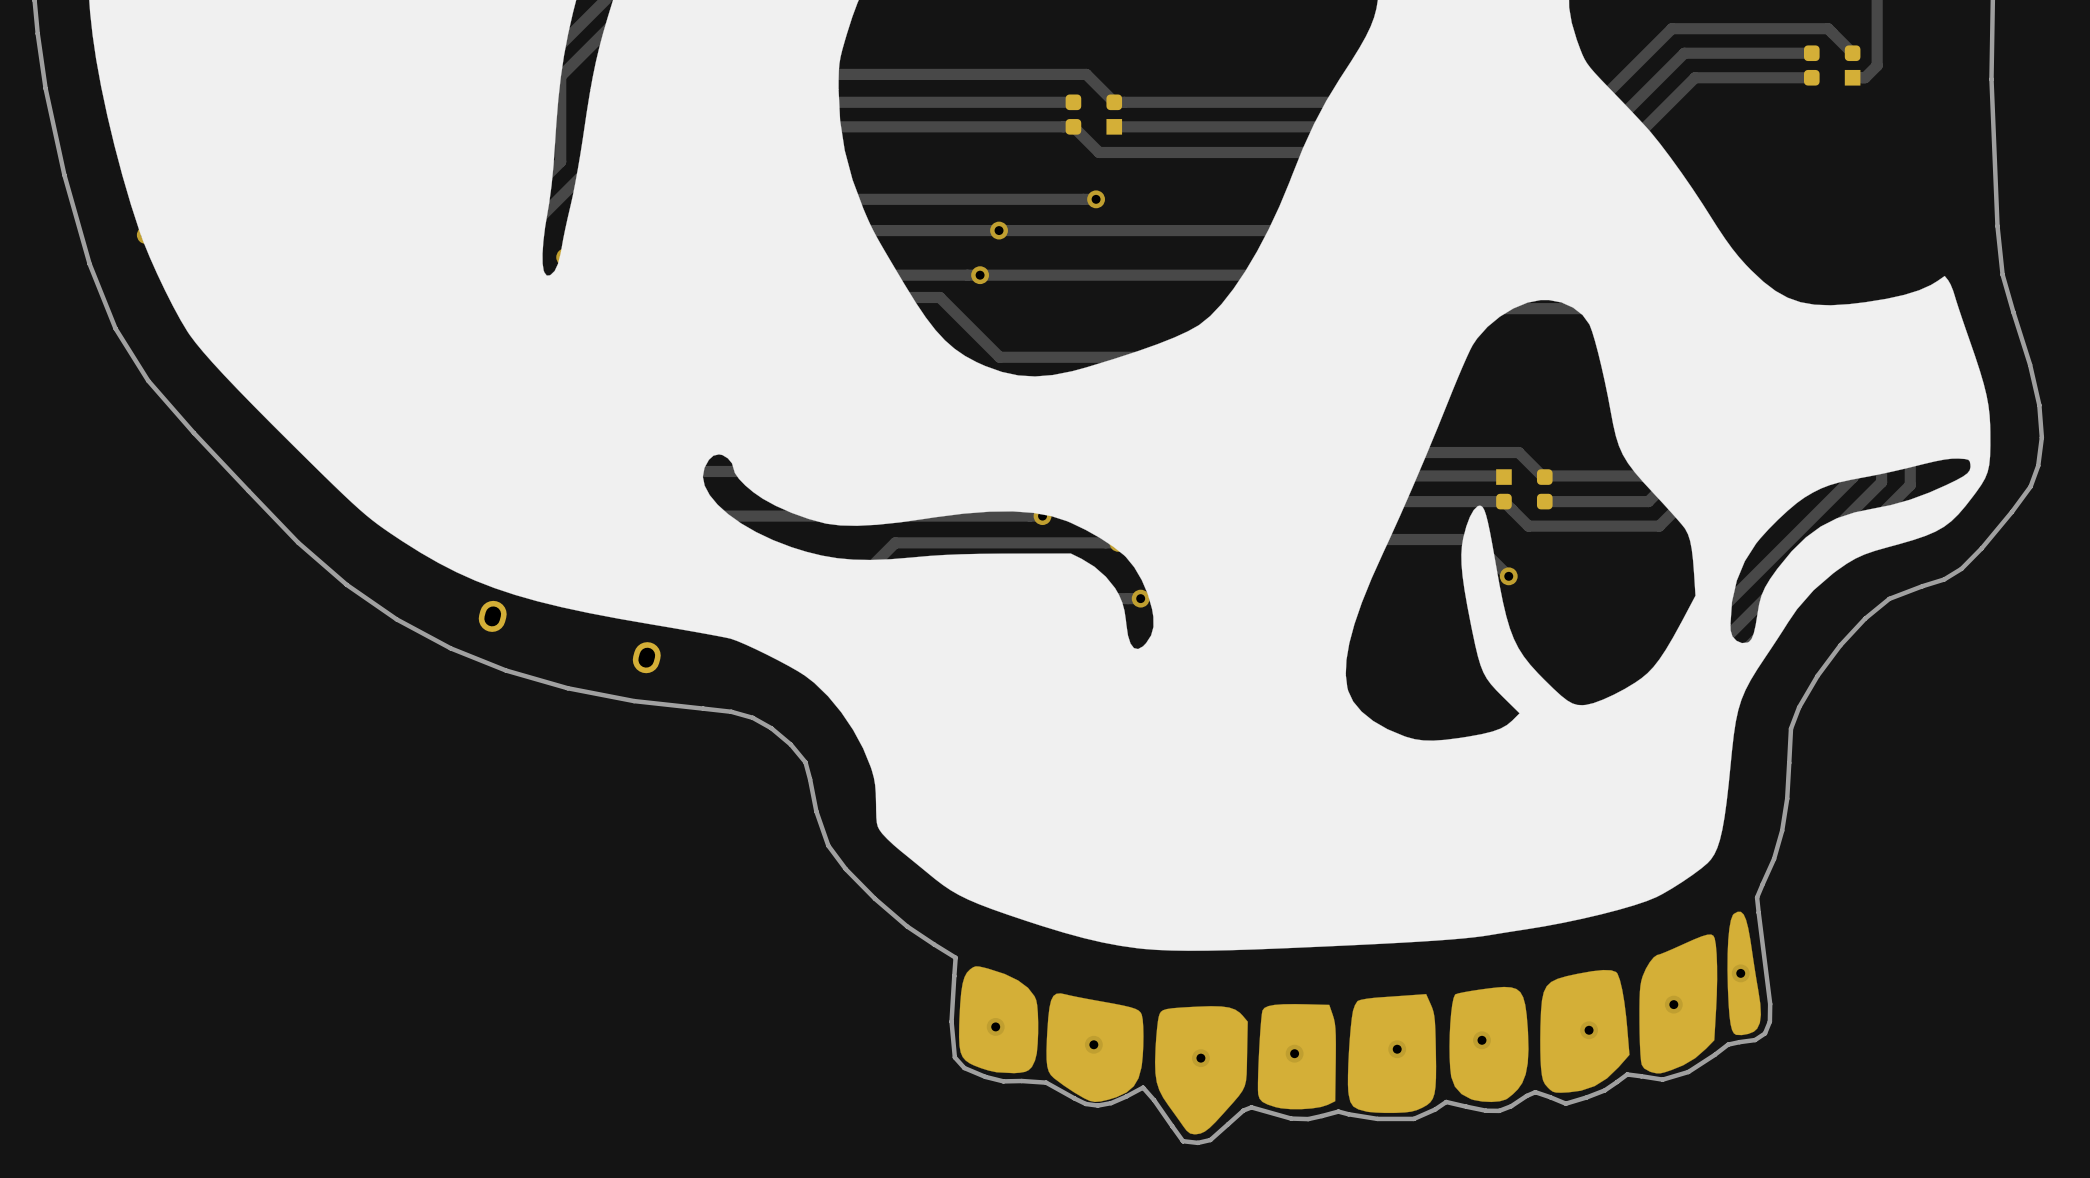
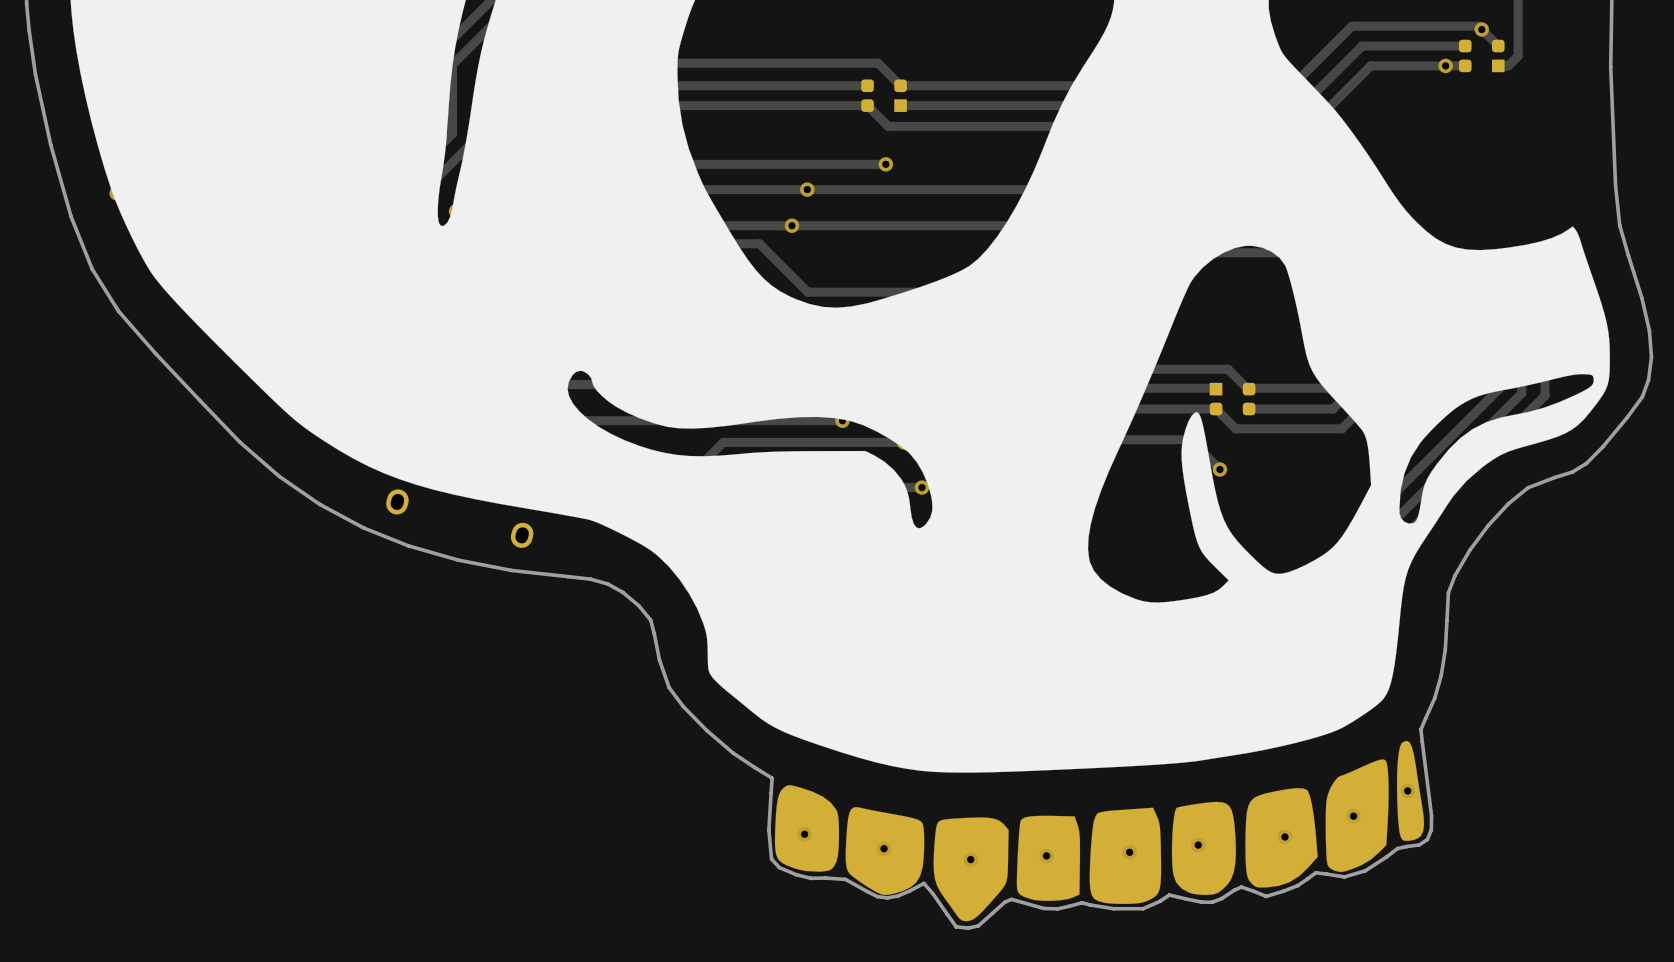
via: none -> (1481, 29)
via: none -> (1445, 65)

